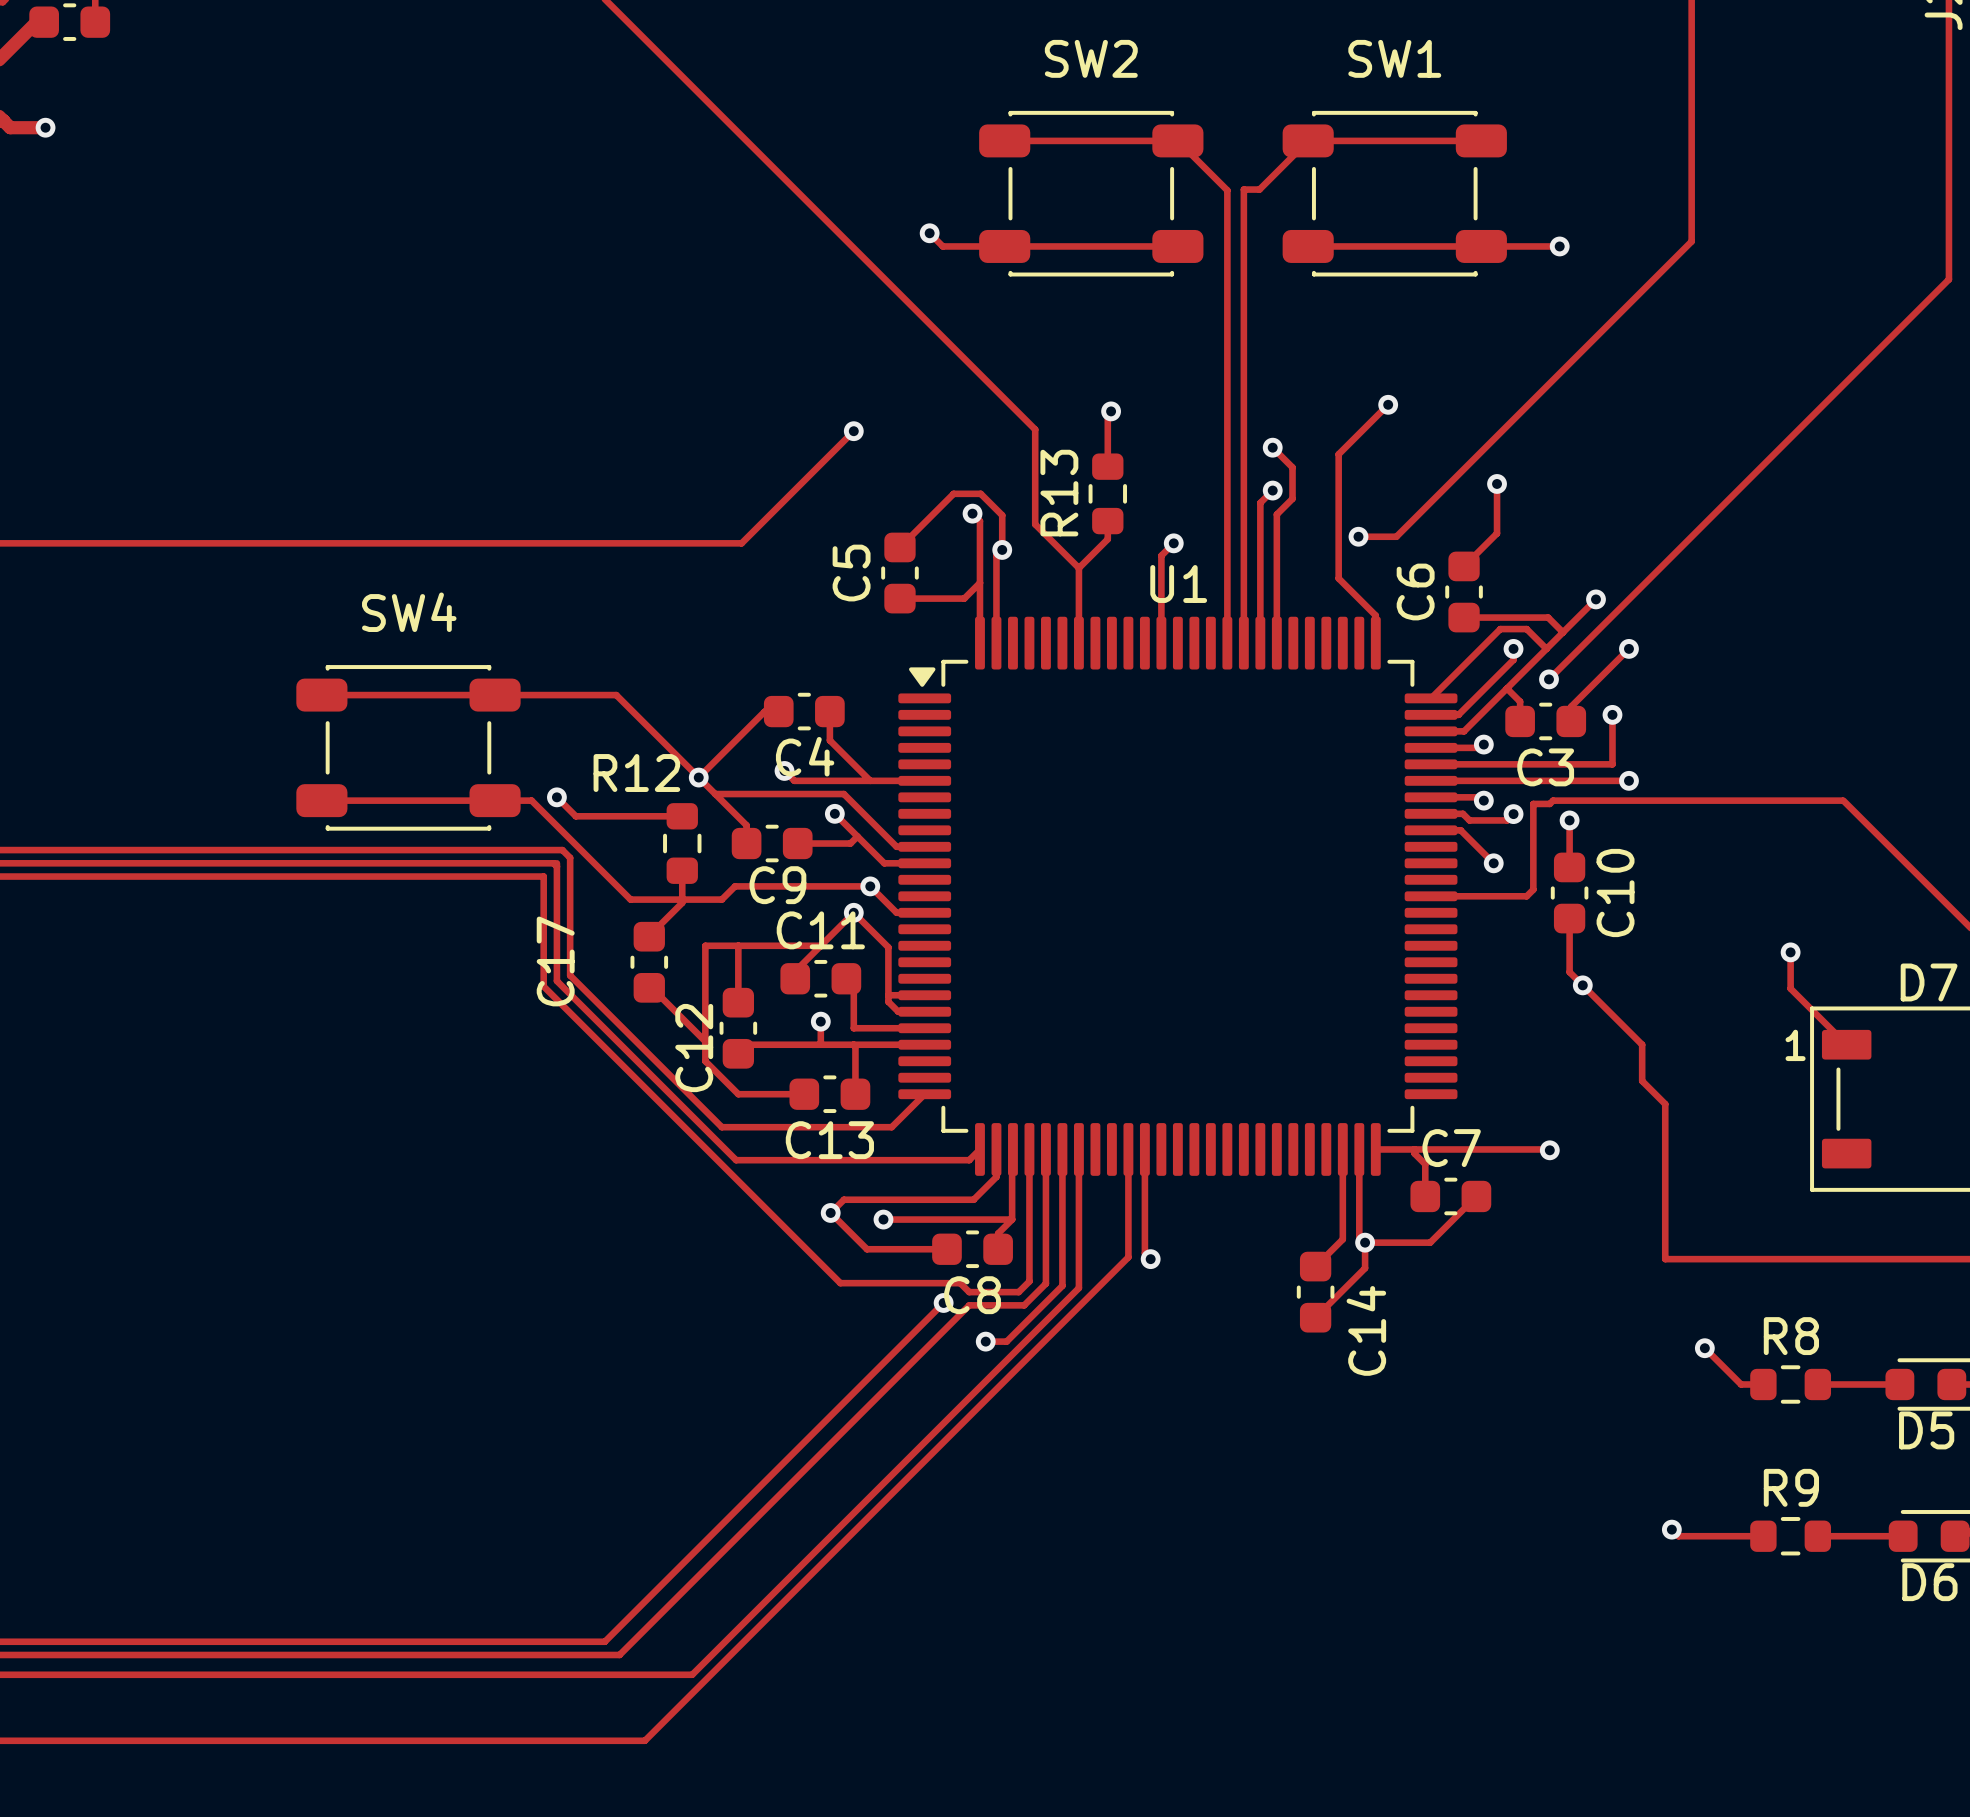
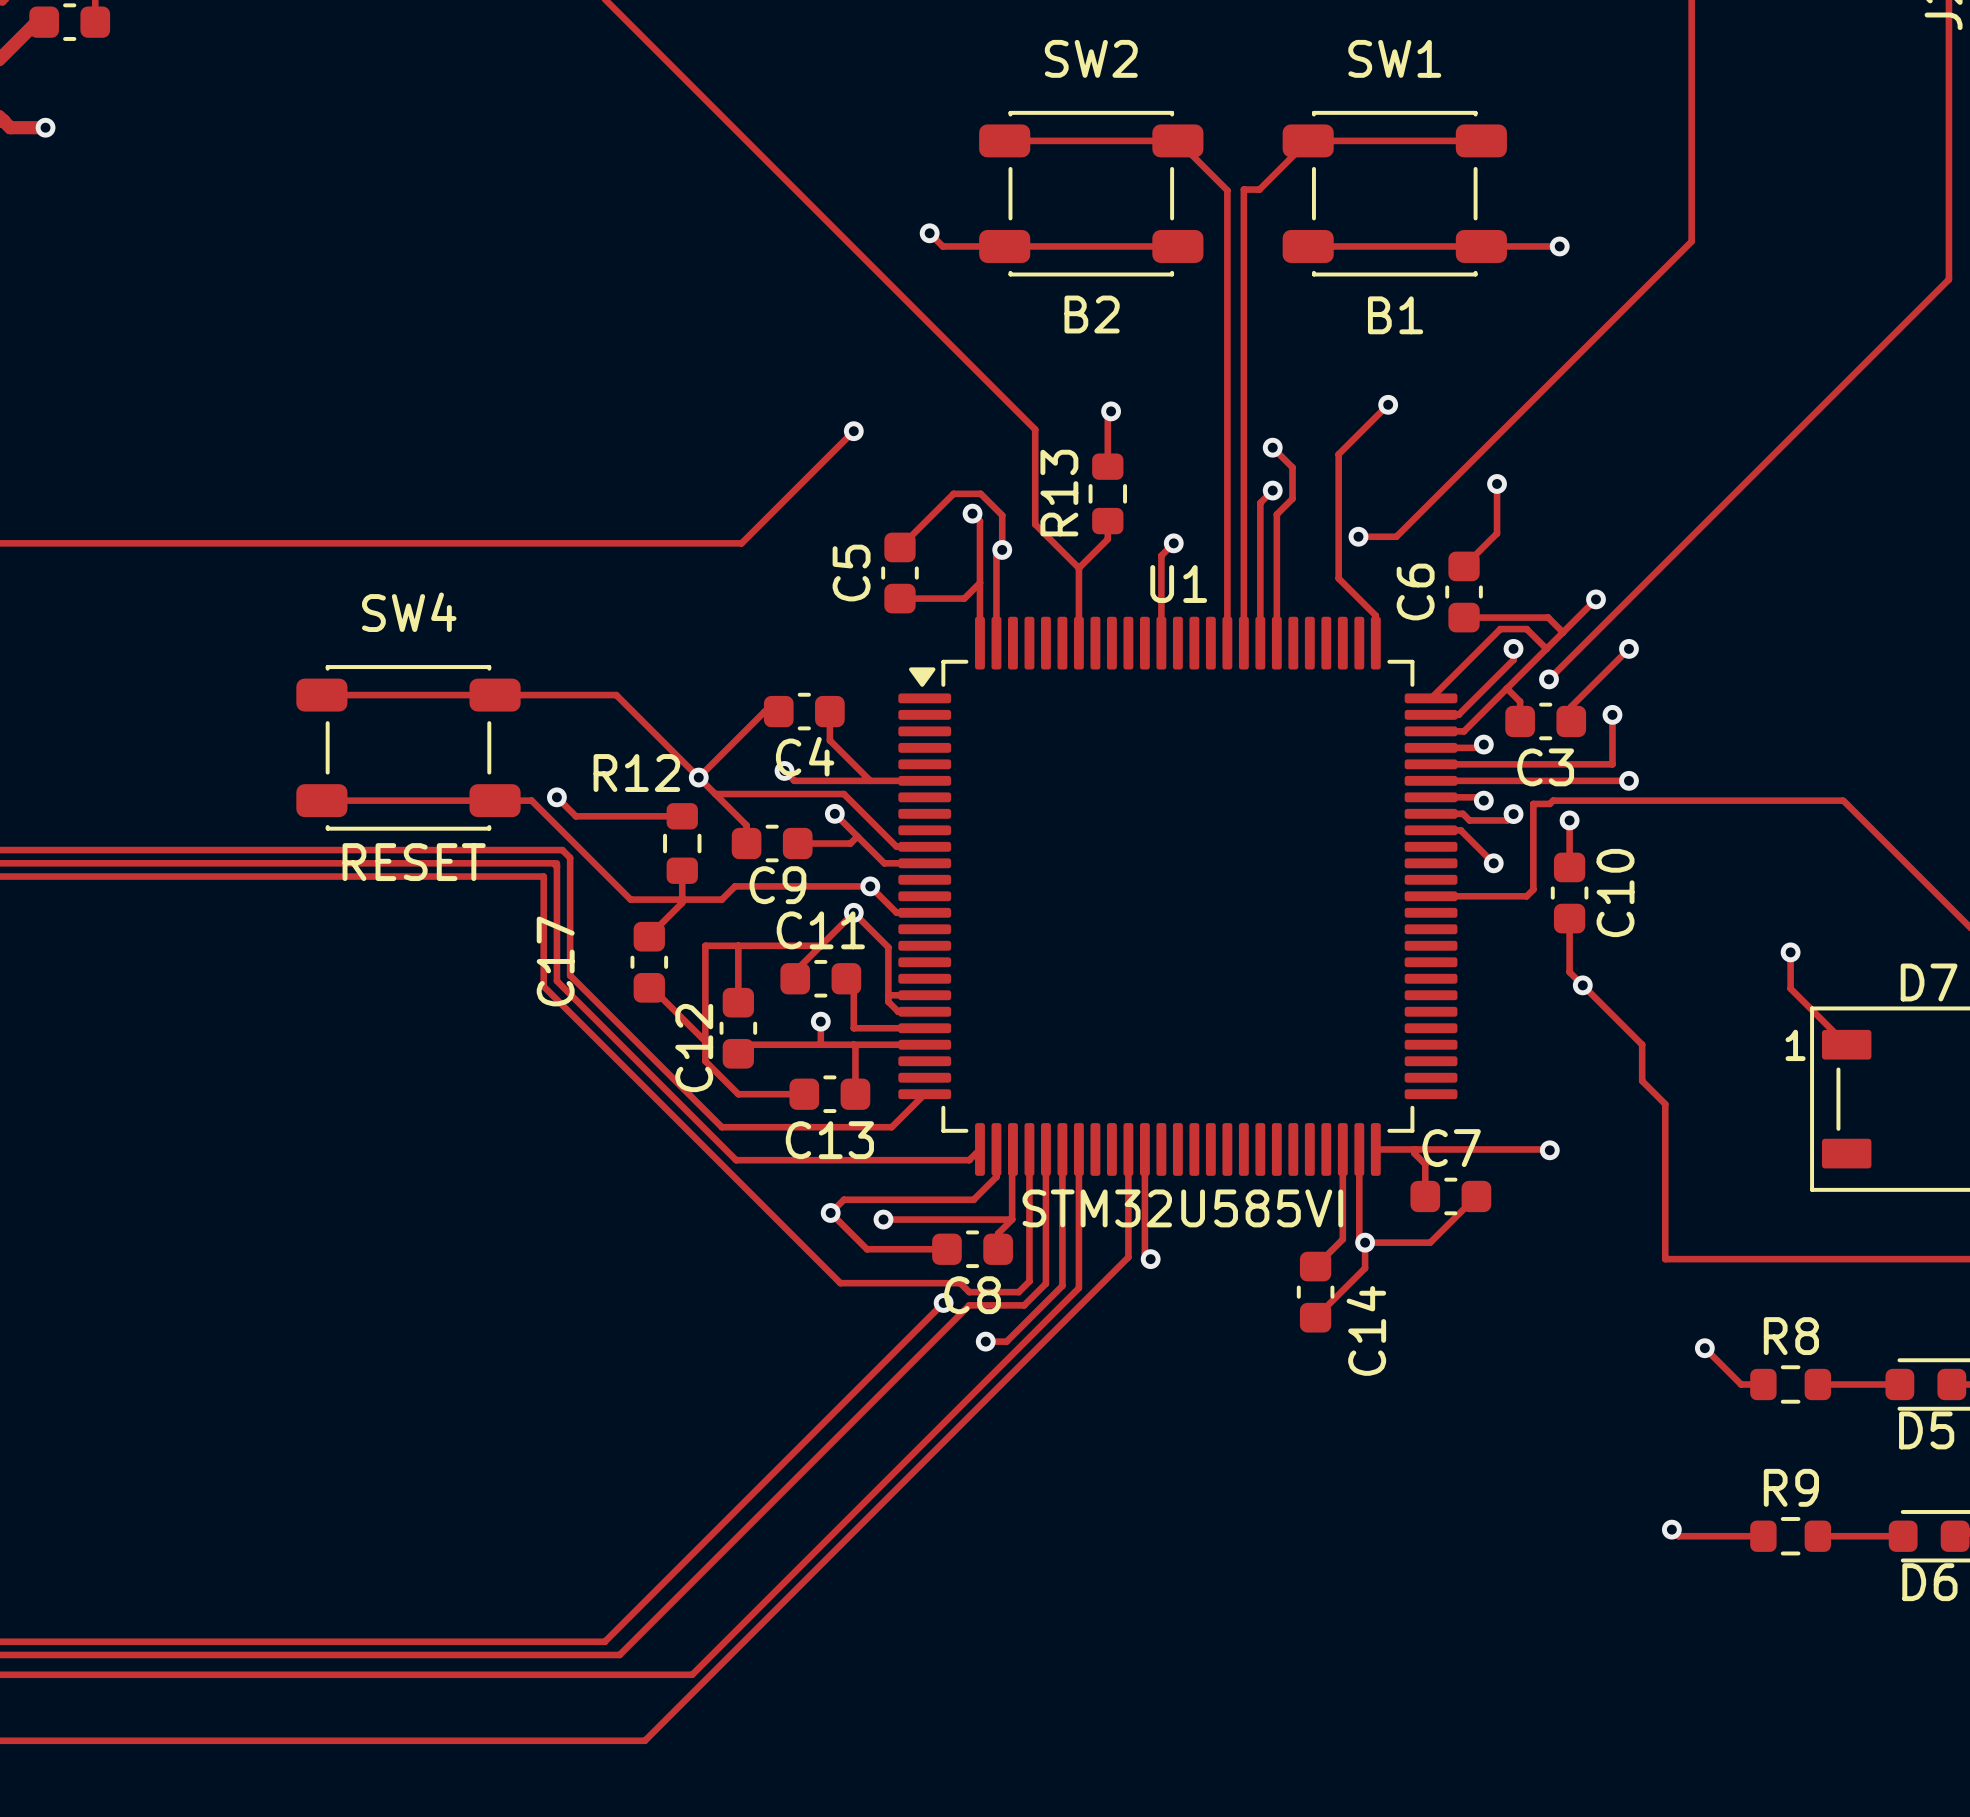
text: none -> B2 (1092, 314)
text: none -> B1 (1395, 315)
text: none -> RESET (414, 862)
text: none -> STM32U585VI (1182, 1208)

